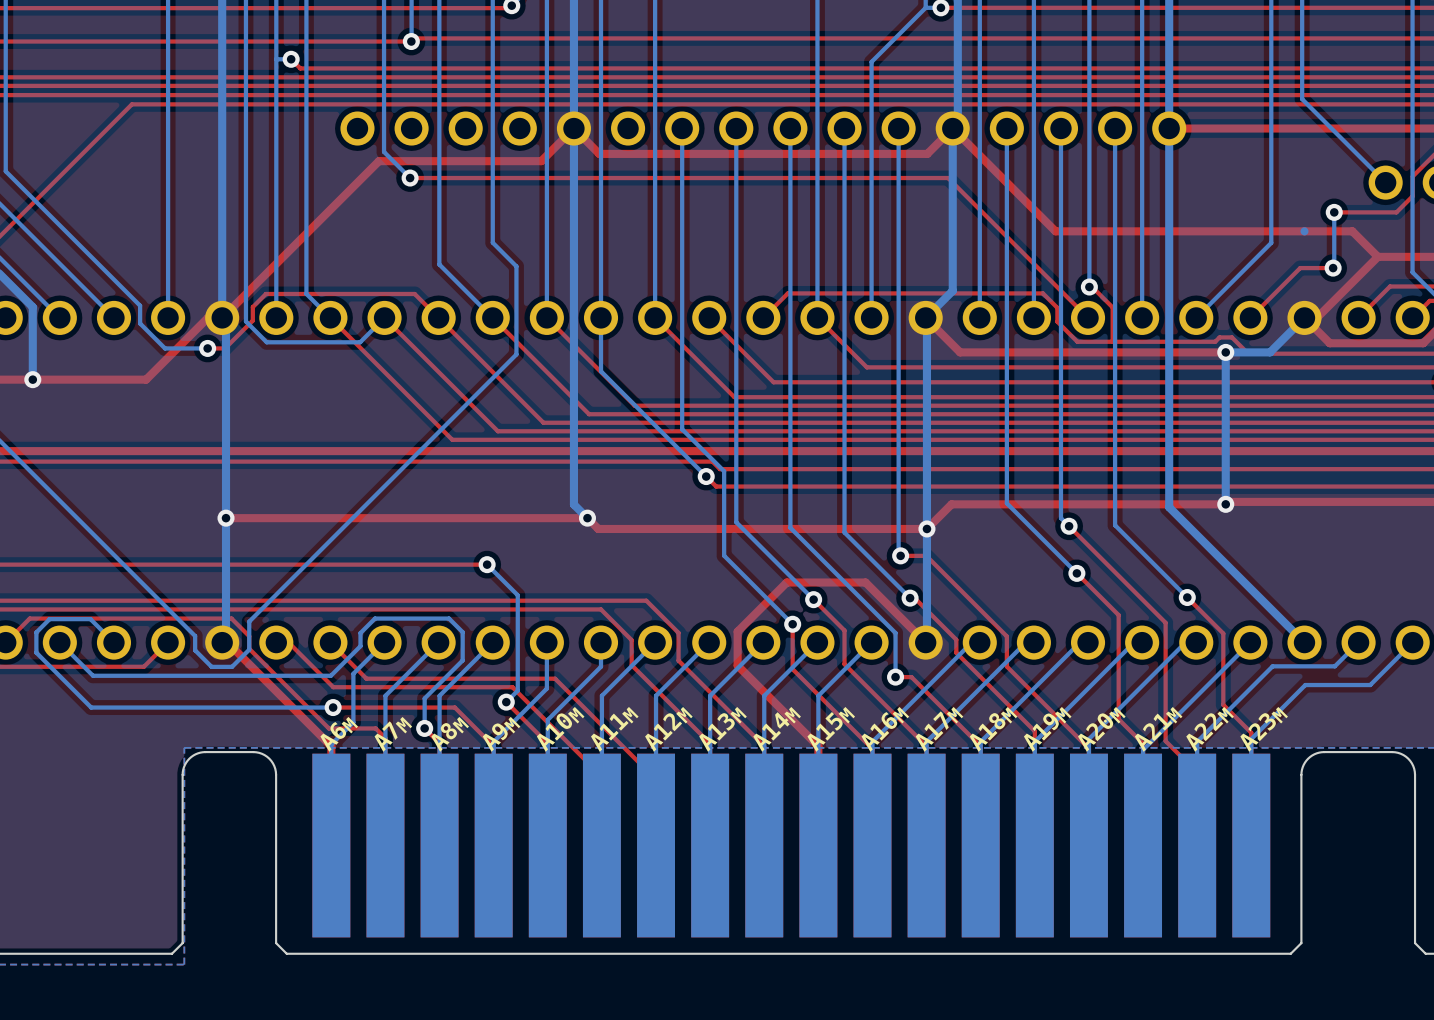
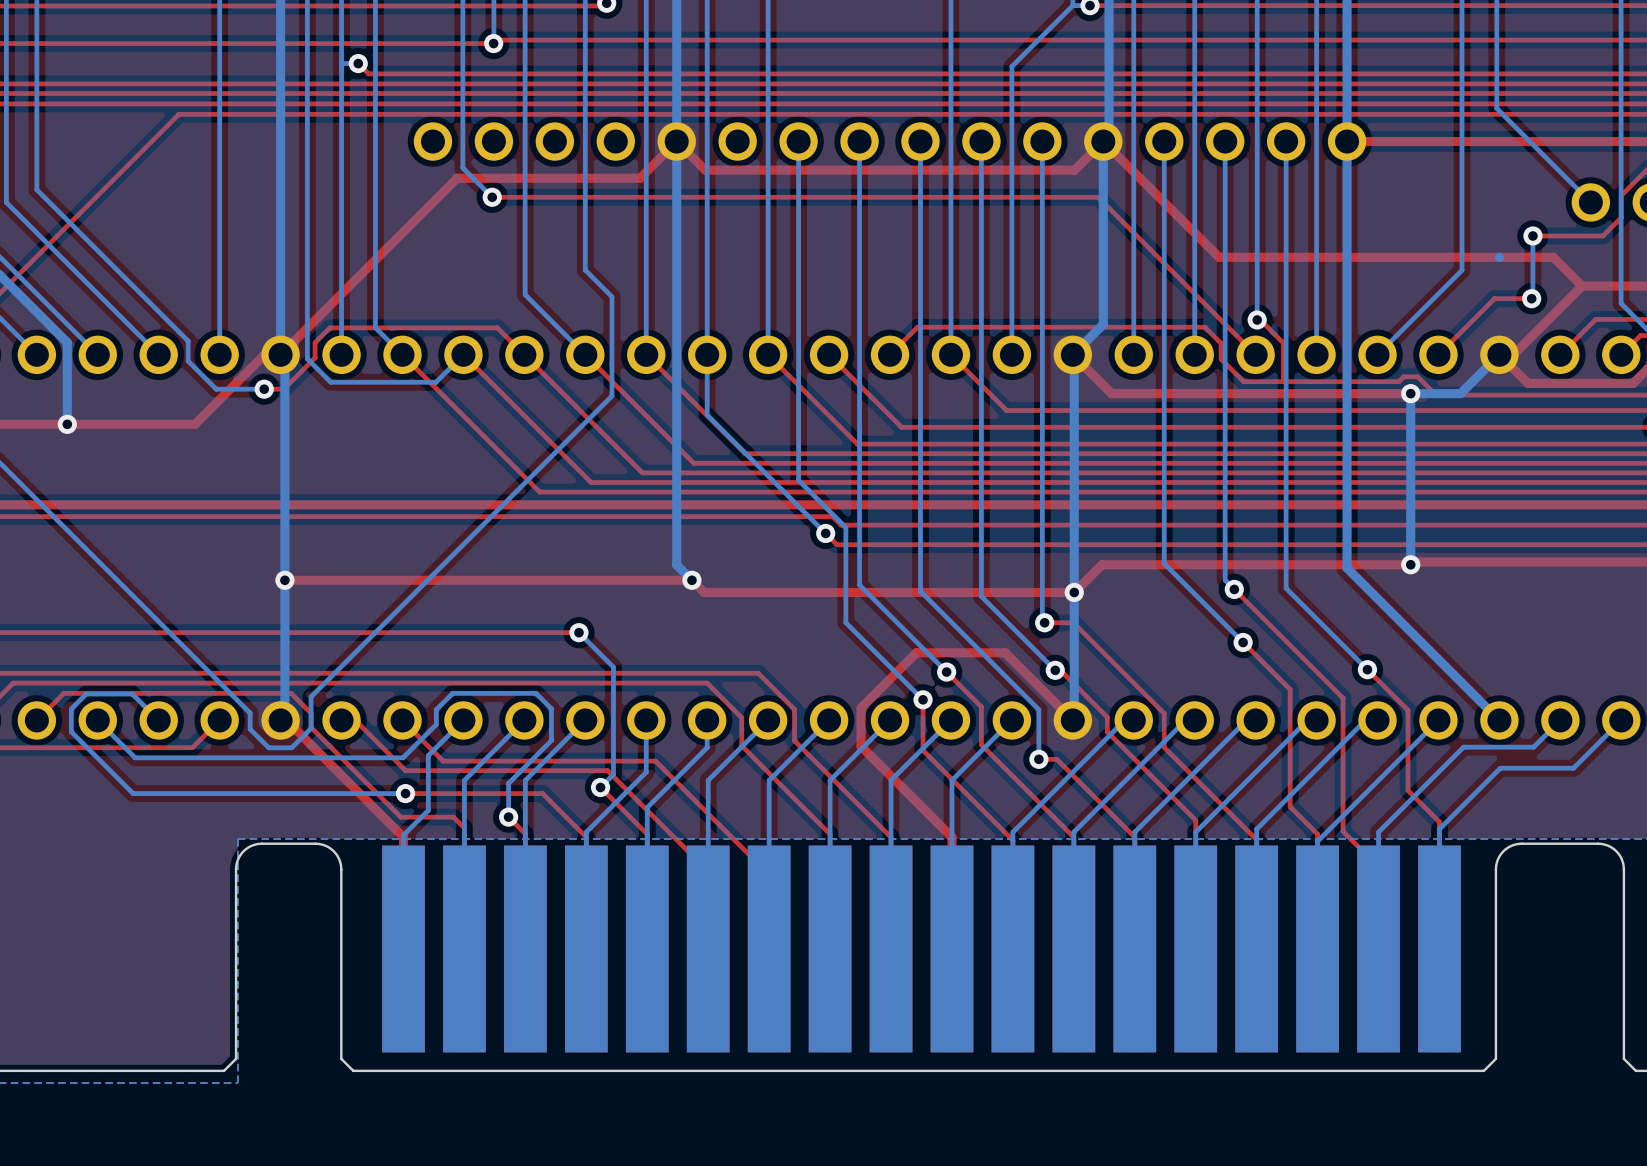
text: A10M (560, 729) -> none
text: A11M (614, 729) -> none
text: A12M (668, 729) -> none
text: A13M (723, 729) -> none
text: A14M (777, 729) -> none
text: A15M (831, 729) -> none
text: A16M (885, 729) -> none
text: A17M (939, 729) -> none
text: A18M (993, 729) -> none
text: A19M (1047, 729) -> none
text: A20M (1101, 729) -> none
text: A21M (1158, 729) -> none
text: A22M (1210, 729) -> none
text: A23M (1264, 729) -> none
text: A6M (339, 734) -> none
text: A7M (393, 734) -> none
text: A8M (450, 734) -> none
text: A9M (501, 734) -> none

